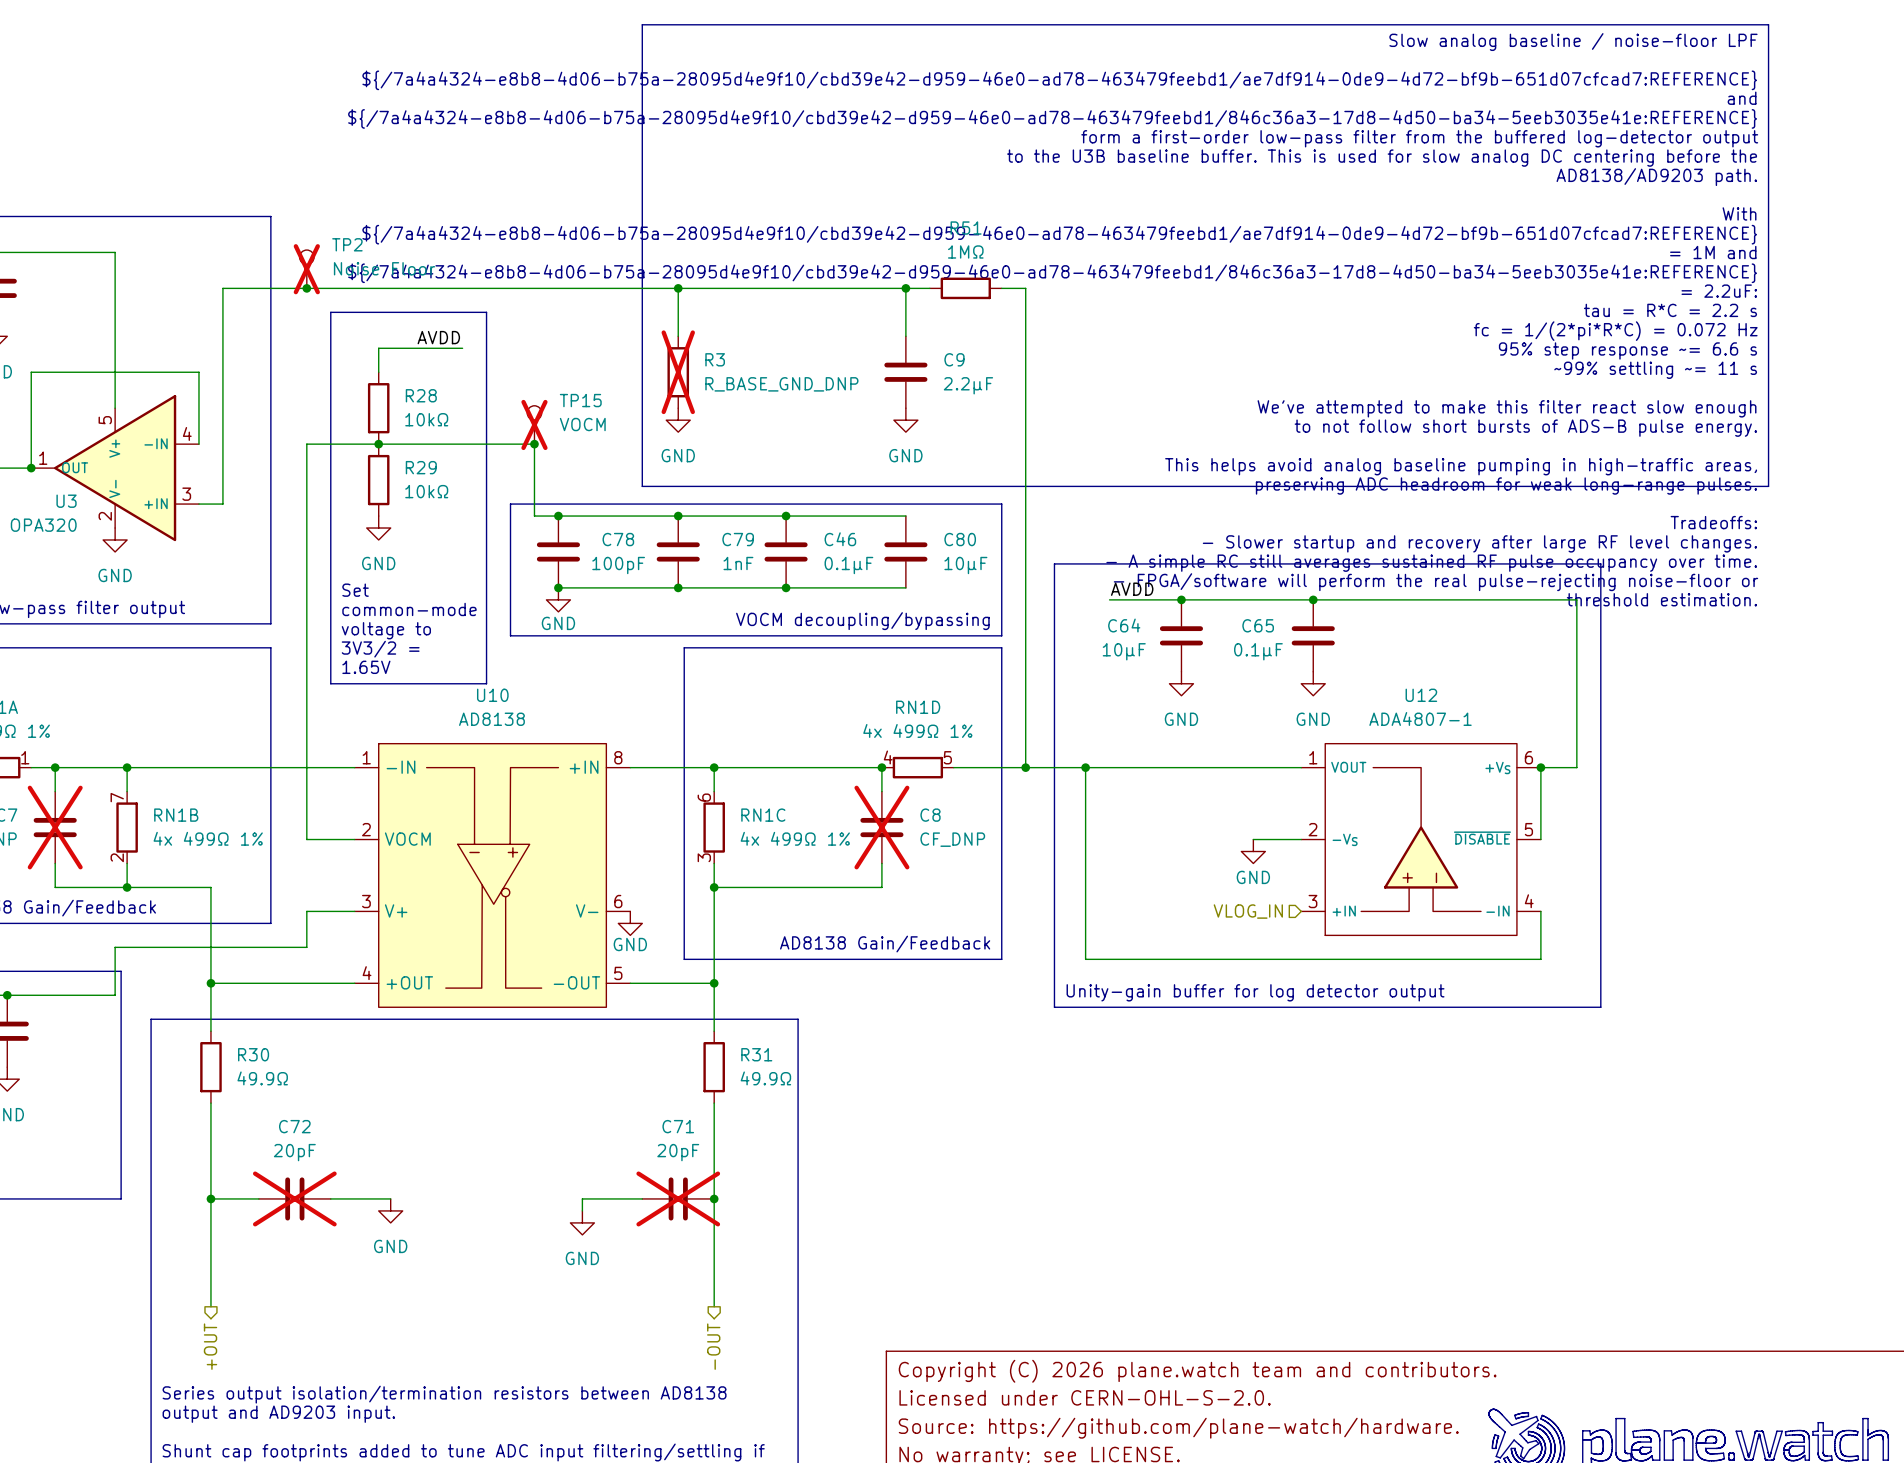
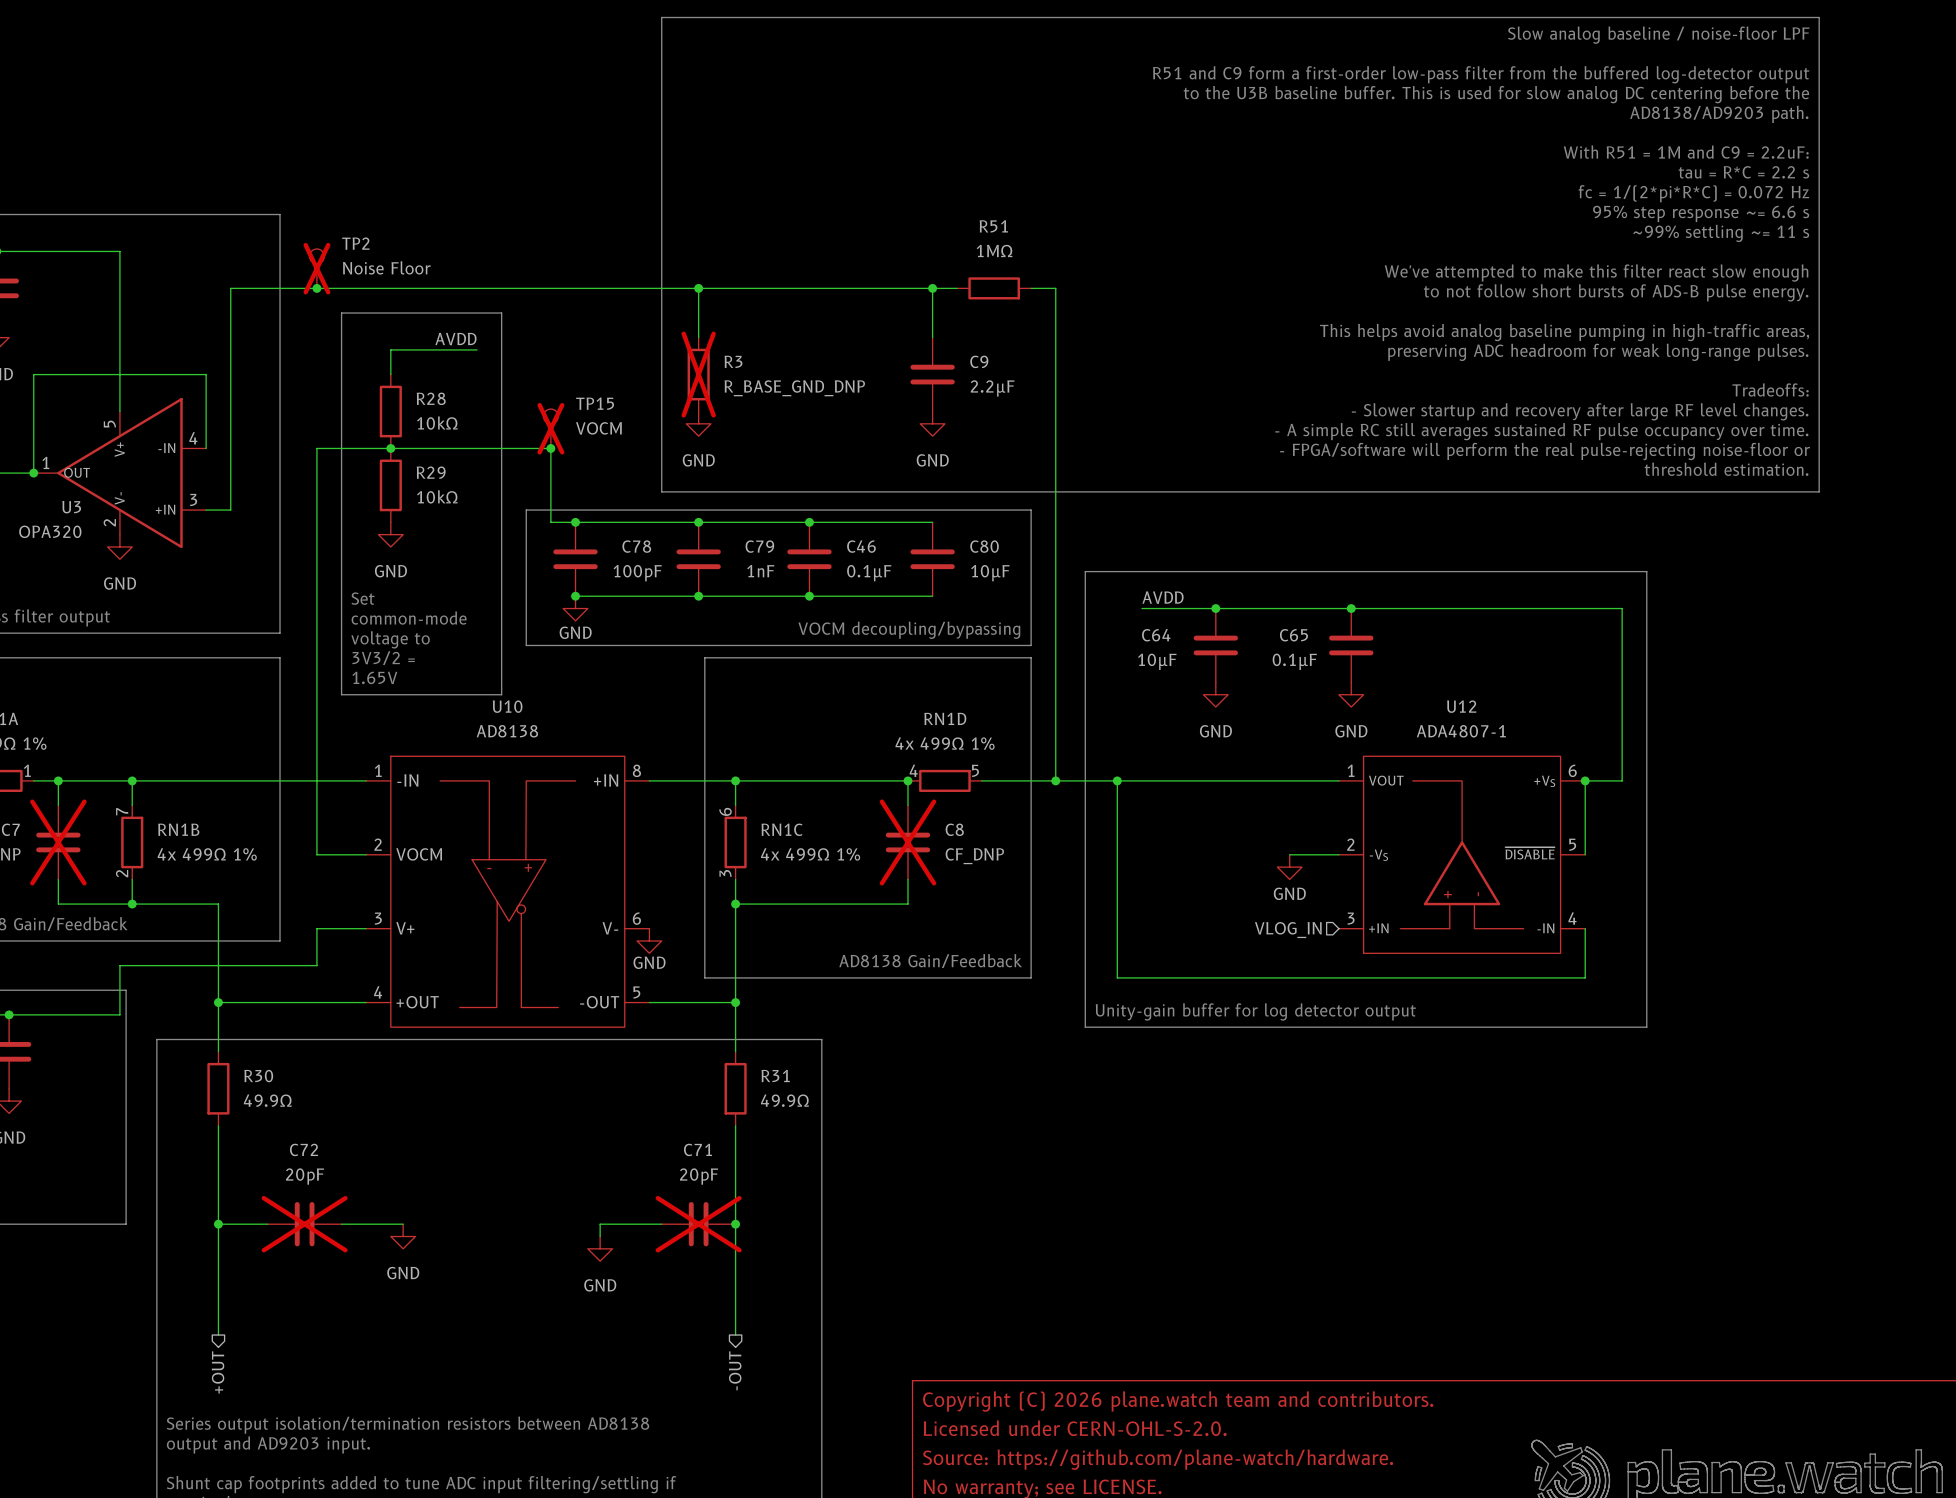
text: ${/7a4a4324-e8b8-4d06-b75a-28095d4e9f10/cbd39e42-d959-46e0-ad78-463479feebd1/ae7df914-0de9-4d72-bf9b-651d07cfcad7:REFERENCE} (1059, 80) -> R51 and C9 form a first-order low-pass filter from the buffered log-detector output (1481, 74)
text: and (1742, 98) -> to the U3B baseline buffer. This is used for slow analog DC centering before the (1496, 94)
text: ${/7a4a4324-e8b8-4d06-b75a-28095d4e9f10/cbd39e42-d959-46e0-ad78-463479feebd1/846c36a3-17d8-4d50-ba34-5eeb3035e41e:REFERENCE} (1052, 118) -> AD8138/AD9203 path. (1719, 114)
text: form a first-order low-pass filter from the buffered log-detector output (1419, 138) -> none
text: to the U3B baseline buffer. This is used for slow analog DC centering before the (1382, 158) -> With R51 = 1M and C9 = 2.2uF: (1686, 152)
text: AD8138/AD9203 path. (1656, 177) -> tau = R*C = 2.2 s (1743, 172)
text: none -> fc = 1/(2*pi*R*C) = 0.072 Hz (1693, 193)
text: With (1739, 213) -> 95% step response ~= 6.6 s (1701, 213)
text: ${/7a4a4324-e8b8-4d06-b75a-28095d4e9f10/cbd39e42-d959-46e0-ad78-463479feebd1/ae7df914-0de9-4d72-bf9b-651d07cfcad7:REFERENCE} (1059, 234) -> ~99% settling ~= 11 s (1721, 233)
text: = 1M and (1713, 252) -> none
text: ${/7a4a4324-e8b8-4d06-b75a-28095d4e9f10/cbd39e42-d959-46e0-ad78-463479feebd1/846c36a3-17d8-4d50-ba34-5eeb3035e41e:REFERENCE} (1052, 273) -> We've attempted to make this filter react slow enough (1596, 273)
text: = 2.2uF: (1719, 291) -> to not follow short bursts of ADS-B pulse energy. (1616, 292)
text: tau = R*C = 2.2 s (1670, 310) -> none
text: fc = 1/(2*pi*R*C) = 0.072 Hz (1615, 331) -> This helps avoid analog baseline pumping in high-traffic areas, (1564, 332)
text: 95% step response ~= 6.6 s (1627, 350) -> preserving ADC headroom for weak long-range pulses. (1598, 352)
text: ~99% settling ~= 11 s (1655, 370) -> none
text: We've attempted to make this filter react slow enough (1507, 408) -> - Slower startup and recovery after large RF level changes. (1580, 411)
text: to not follow short bursts of ADS-B pulse energy. (1525, 428) -> - A simple RC still averages sustained RF pulse occupancy over time. (1541, 431)
text: This helps avoid analog baseline pumping in high-traffic areas, (1461, 466) -> threshold estimation. (1726, 469)
text: preserving ADC headroom for weak long-range pulses. (1506, 486) -> none
text position: Tradeoffs: (1713, 522) -> Tradeoffs: (1770, 389)
text: - Slower startup and recovery after large RF level changes. (1479, 543) -> none
text: - A simple RC still averages sustained RF pulse occupancy over time. (1431, 563) -> none
text position: - FPGA/software will perform the real pulse-rejecting noise-floor or (1435, 582) -> - FPGA/software will perform the real pulse-rejecting noise-floor or (1545, 451)
text: threshold estimation. (1661, 599) -> none

